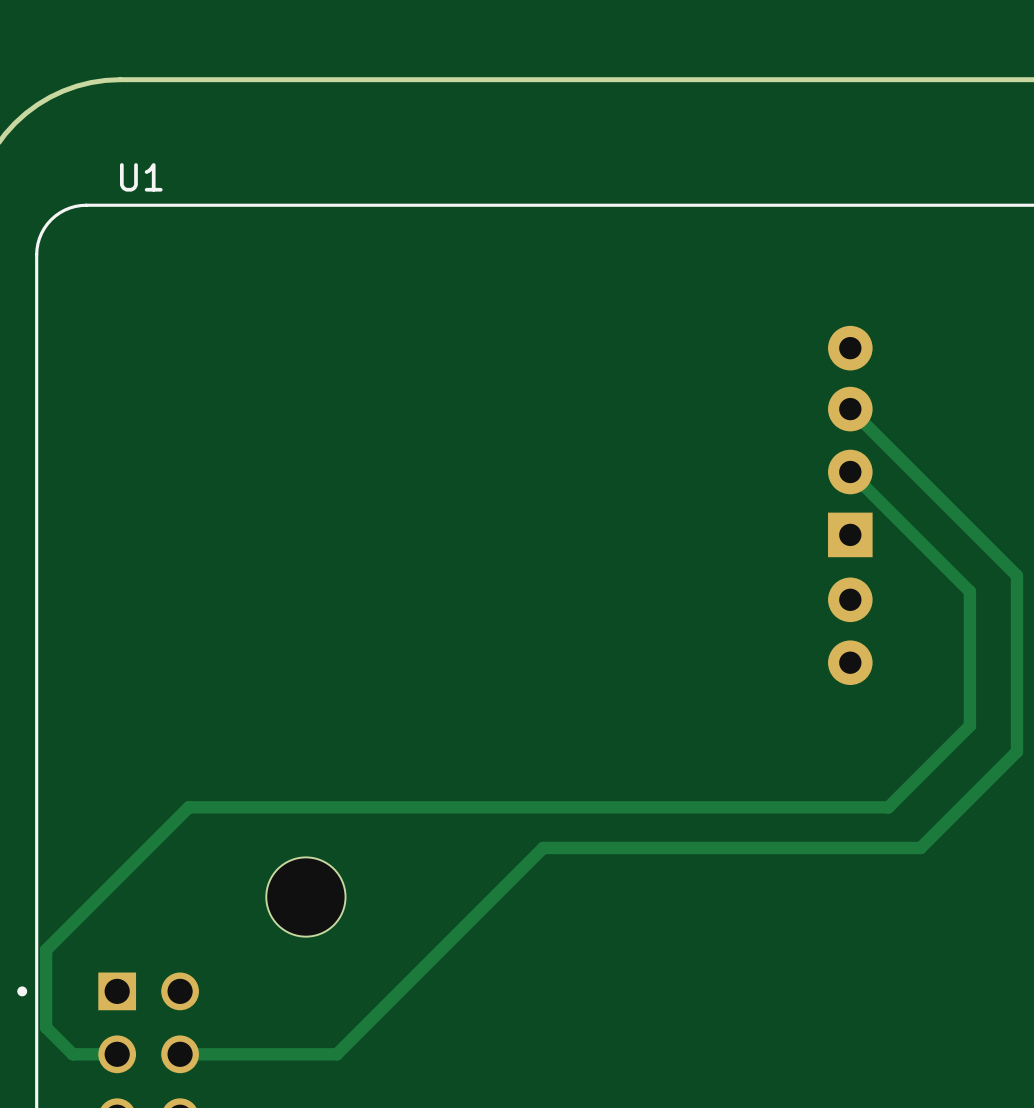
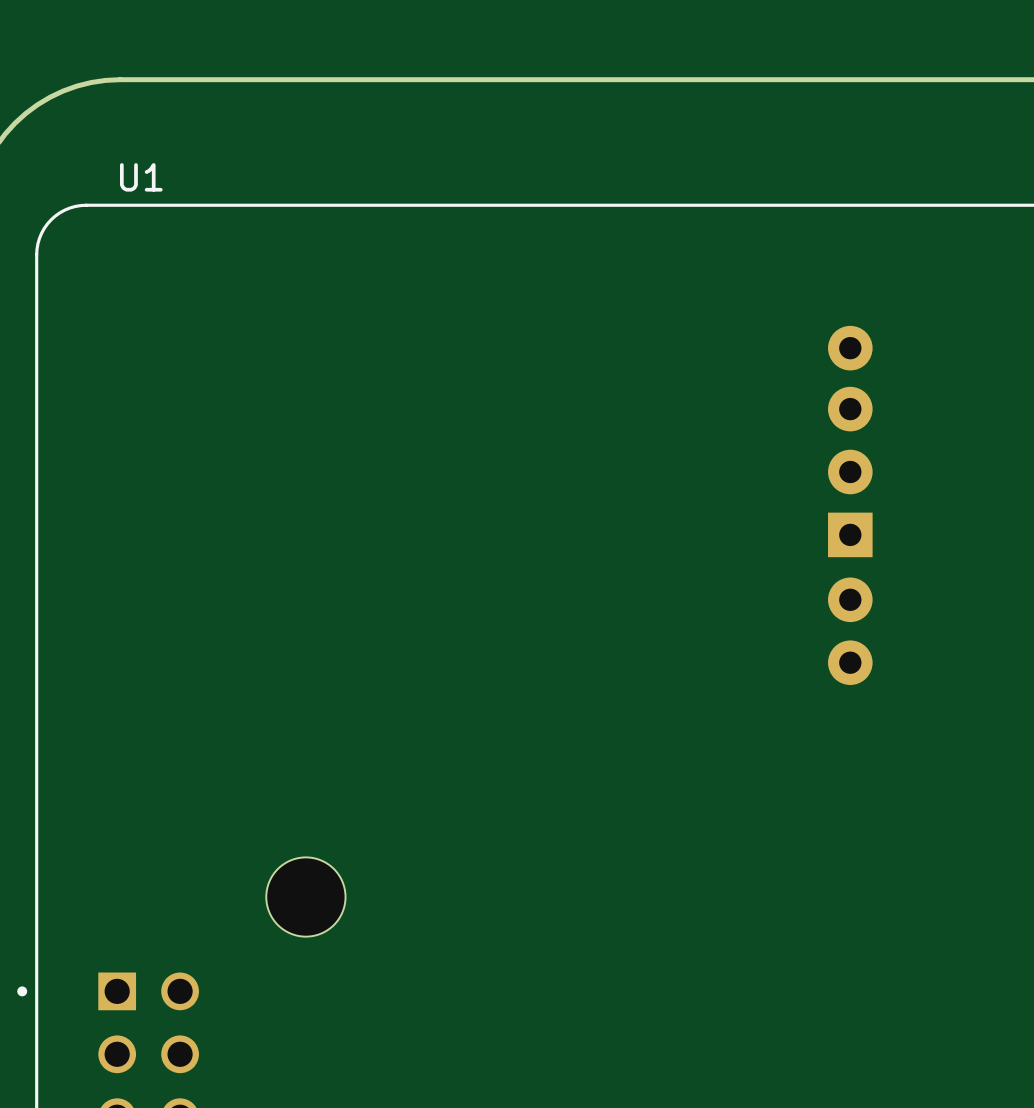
track: (850, 409) (1017, 575) (1017, 751) (920, 847) (543, 847) (336, 1054) (180, 1054) -> none
track: (850, 472) (969, 591) (969, 725) (888, 807) (188, 807) (46, 950) (46, 1027) (72, 1054) (117, 1054) -> none

